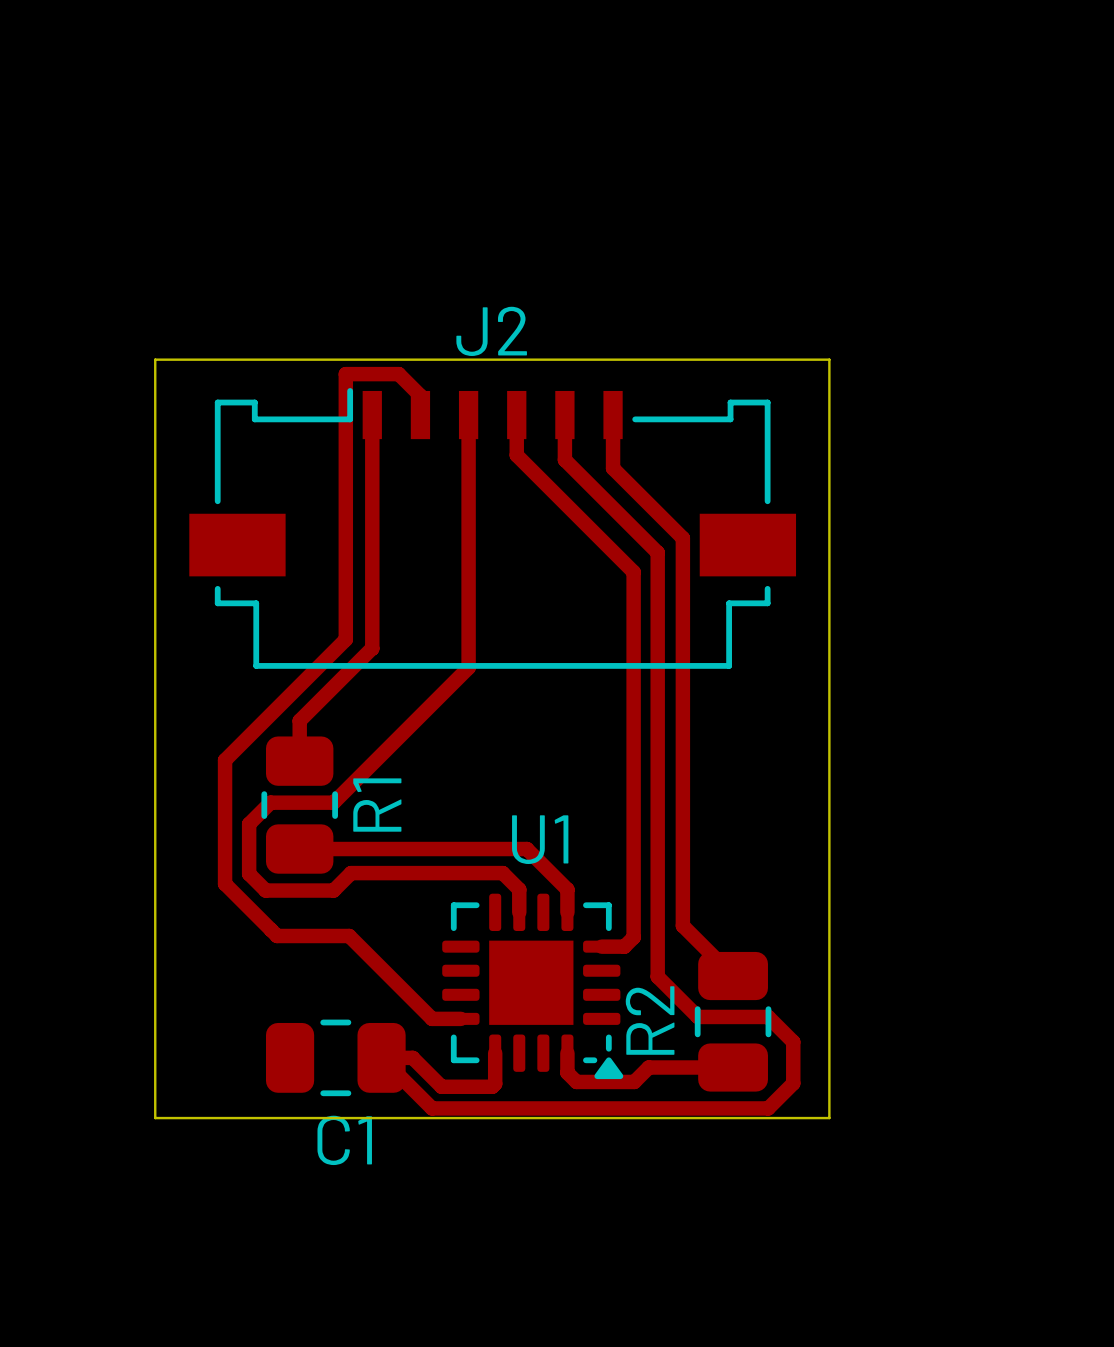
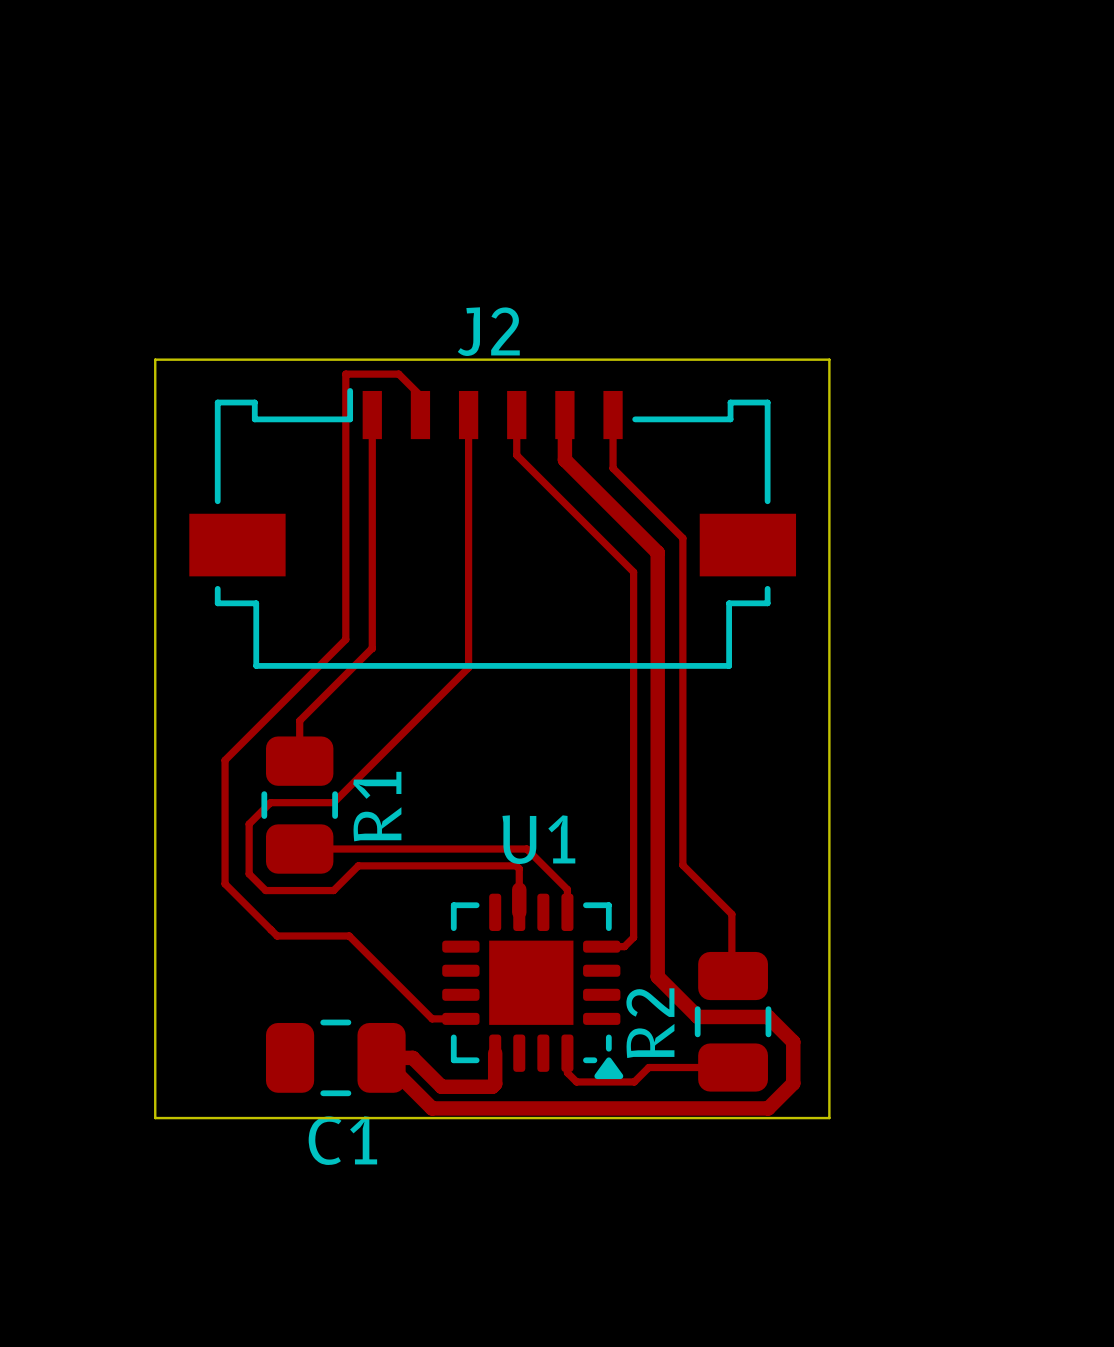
top track width: thick (372, 415) (372, 648) -> thin (372, 415) (372, 648)
top track width: thick (420, 415) (420, 395) (398, 374) (345, 374) (345, 639) (225, 760) (225, 883) (277, 936) (349, 936) (432, 1018) (460, 1018) -> thin (420, 415) (420, 395) (398, 374) (345, 374) (345, 639) (225, 760) (225, 883) (277, 936) (349, 936) (432, 1018) (460, 1018)
top track width: thick (468, 415) (468, 667) (333, 802) (270, 802) (249, 824) (249, 873) (265, 890) (333, 890) (351, 873) -> thin (468, 415) (468, 667) (333, 802) (270, 802) (249, 824) (249, 873) (265, 890) (333, 890) (351, 873)
top track width: thick (516, 415) (516, 455) (633, 572) (633, 937) (624, 946) (601, 946) -> thin (516, 415) (516, 455) (633, 572) (633, 937) (624, 946) (601, 946)
top track width: thick (613, 415) (613, 468) (682, 538) (682, 865) -> thin (613, 415) (613, 468) (682, 538) (682, 865)
top track width: thick (371, 648) (299, 720) (299, 761) -> thin (371, 648) (299, 720) (299, 761)
top track width: thick (299, 849) (526, 849) (567, 889) (567, 912) -> thin (299, 849) (526, 849) (567, 889) (567, 912)
top track: (682, 865) (682, 925) (731, 974) -> (682, 865) (731, 914) (733, 976)
top track: (351, 873) (502, 873) (519, 889) -> (351, 873) (358, 865) (516, 865) (519, 868) (519, 889)
top track width: thick (567, 1053) (567, 1072) (576, 1081) (634, 1081) (648, 1067) (733, 1067) -> thin (567, 1053) (567, 1072) (576, 1081) (634, 1081) (648, 1067) (733, 1067)

